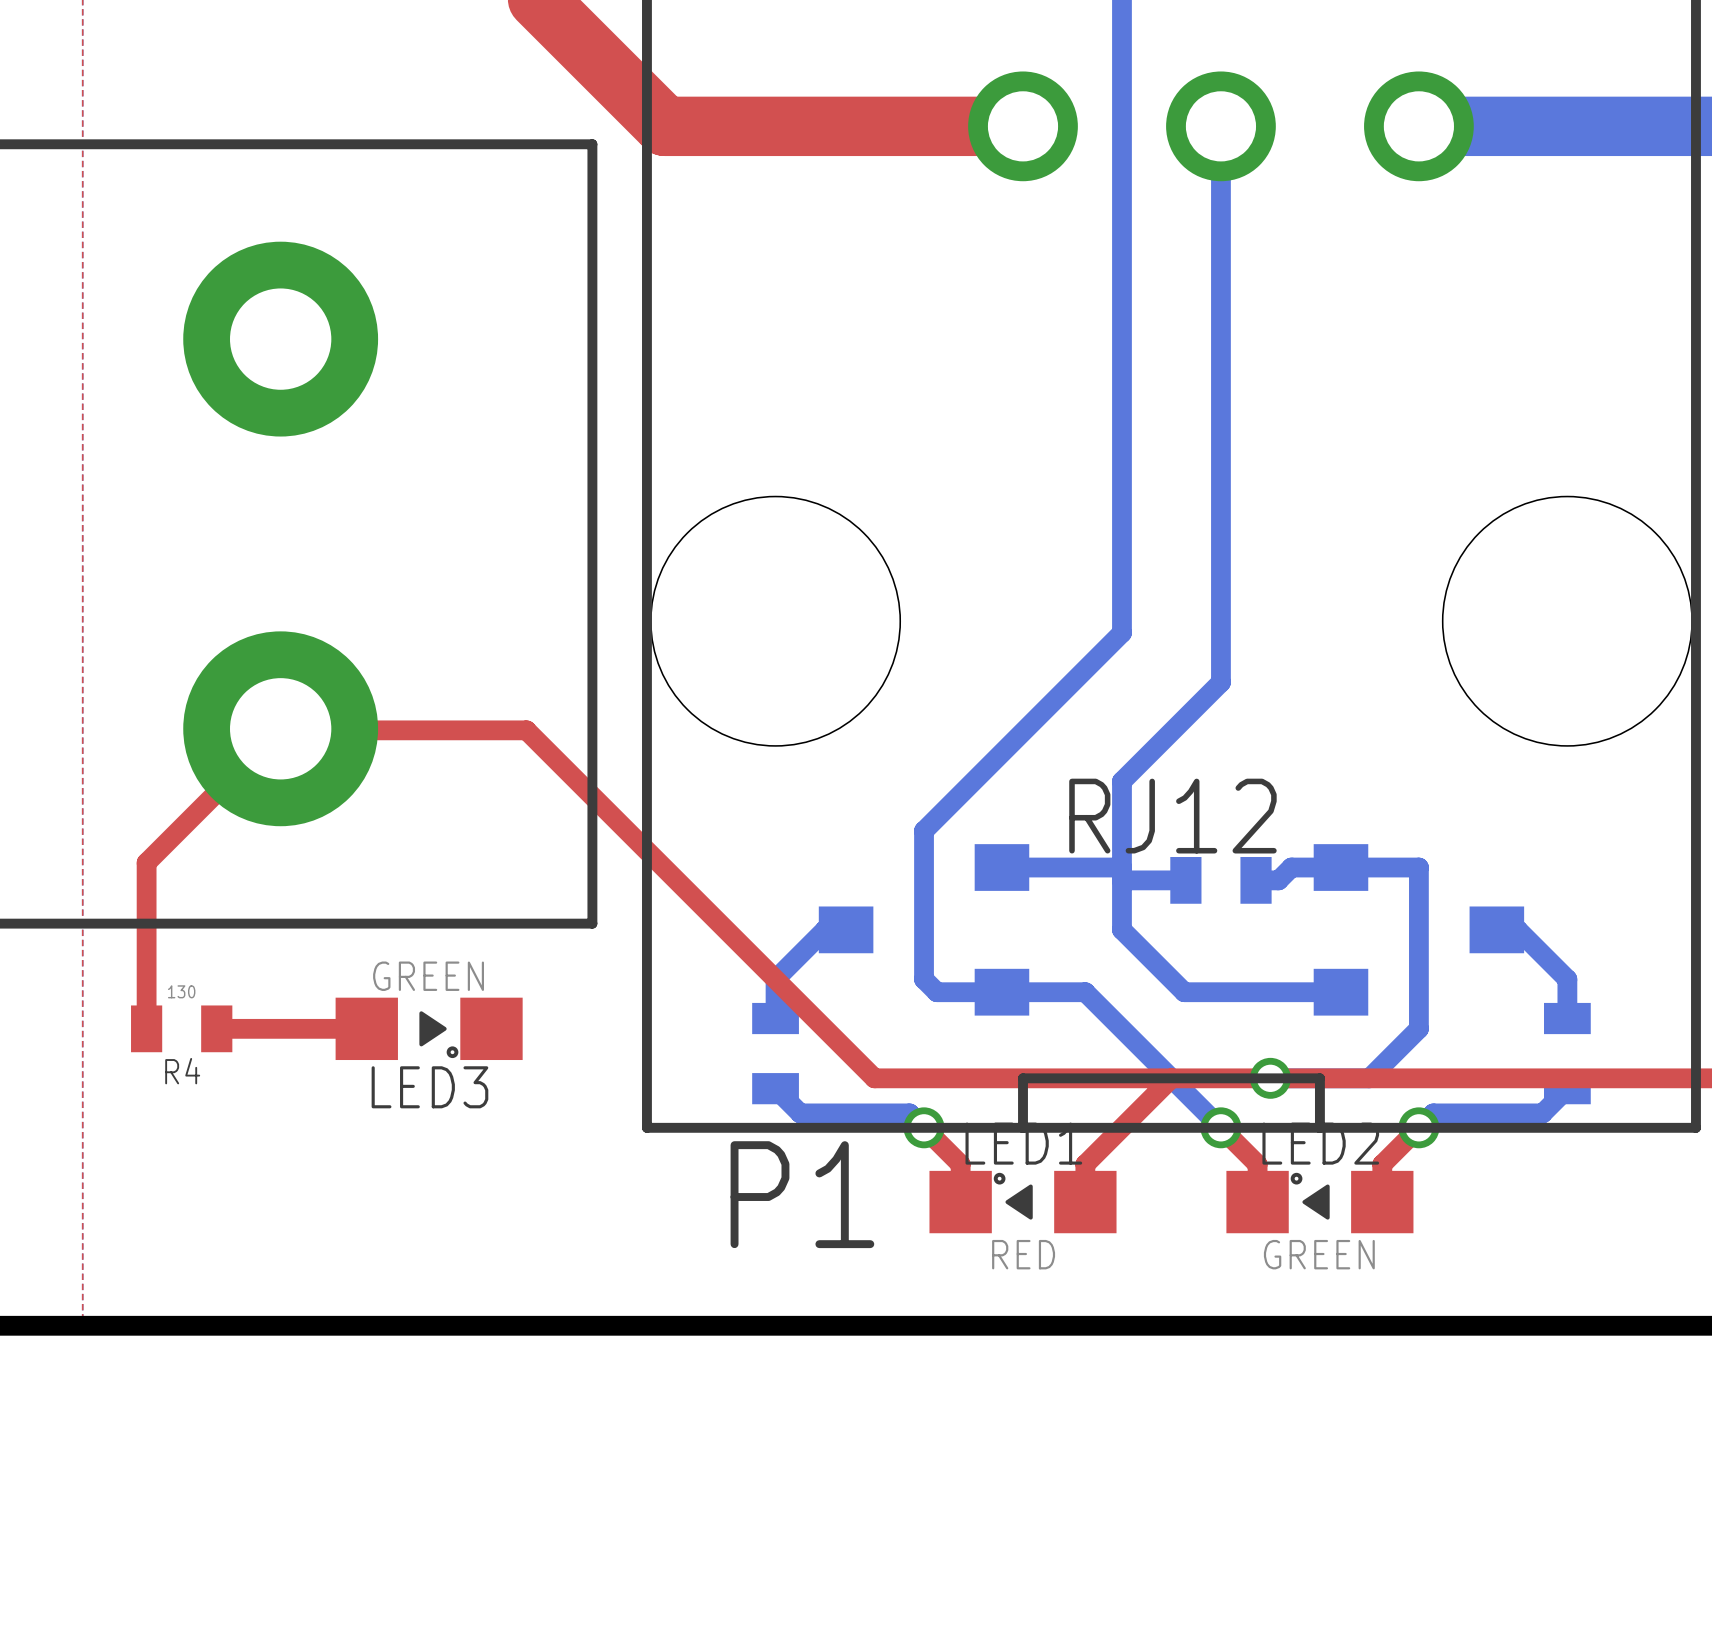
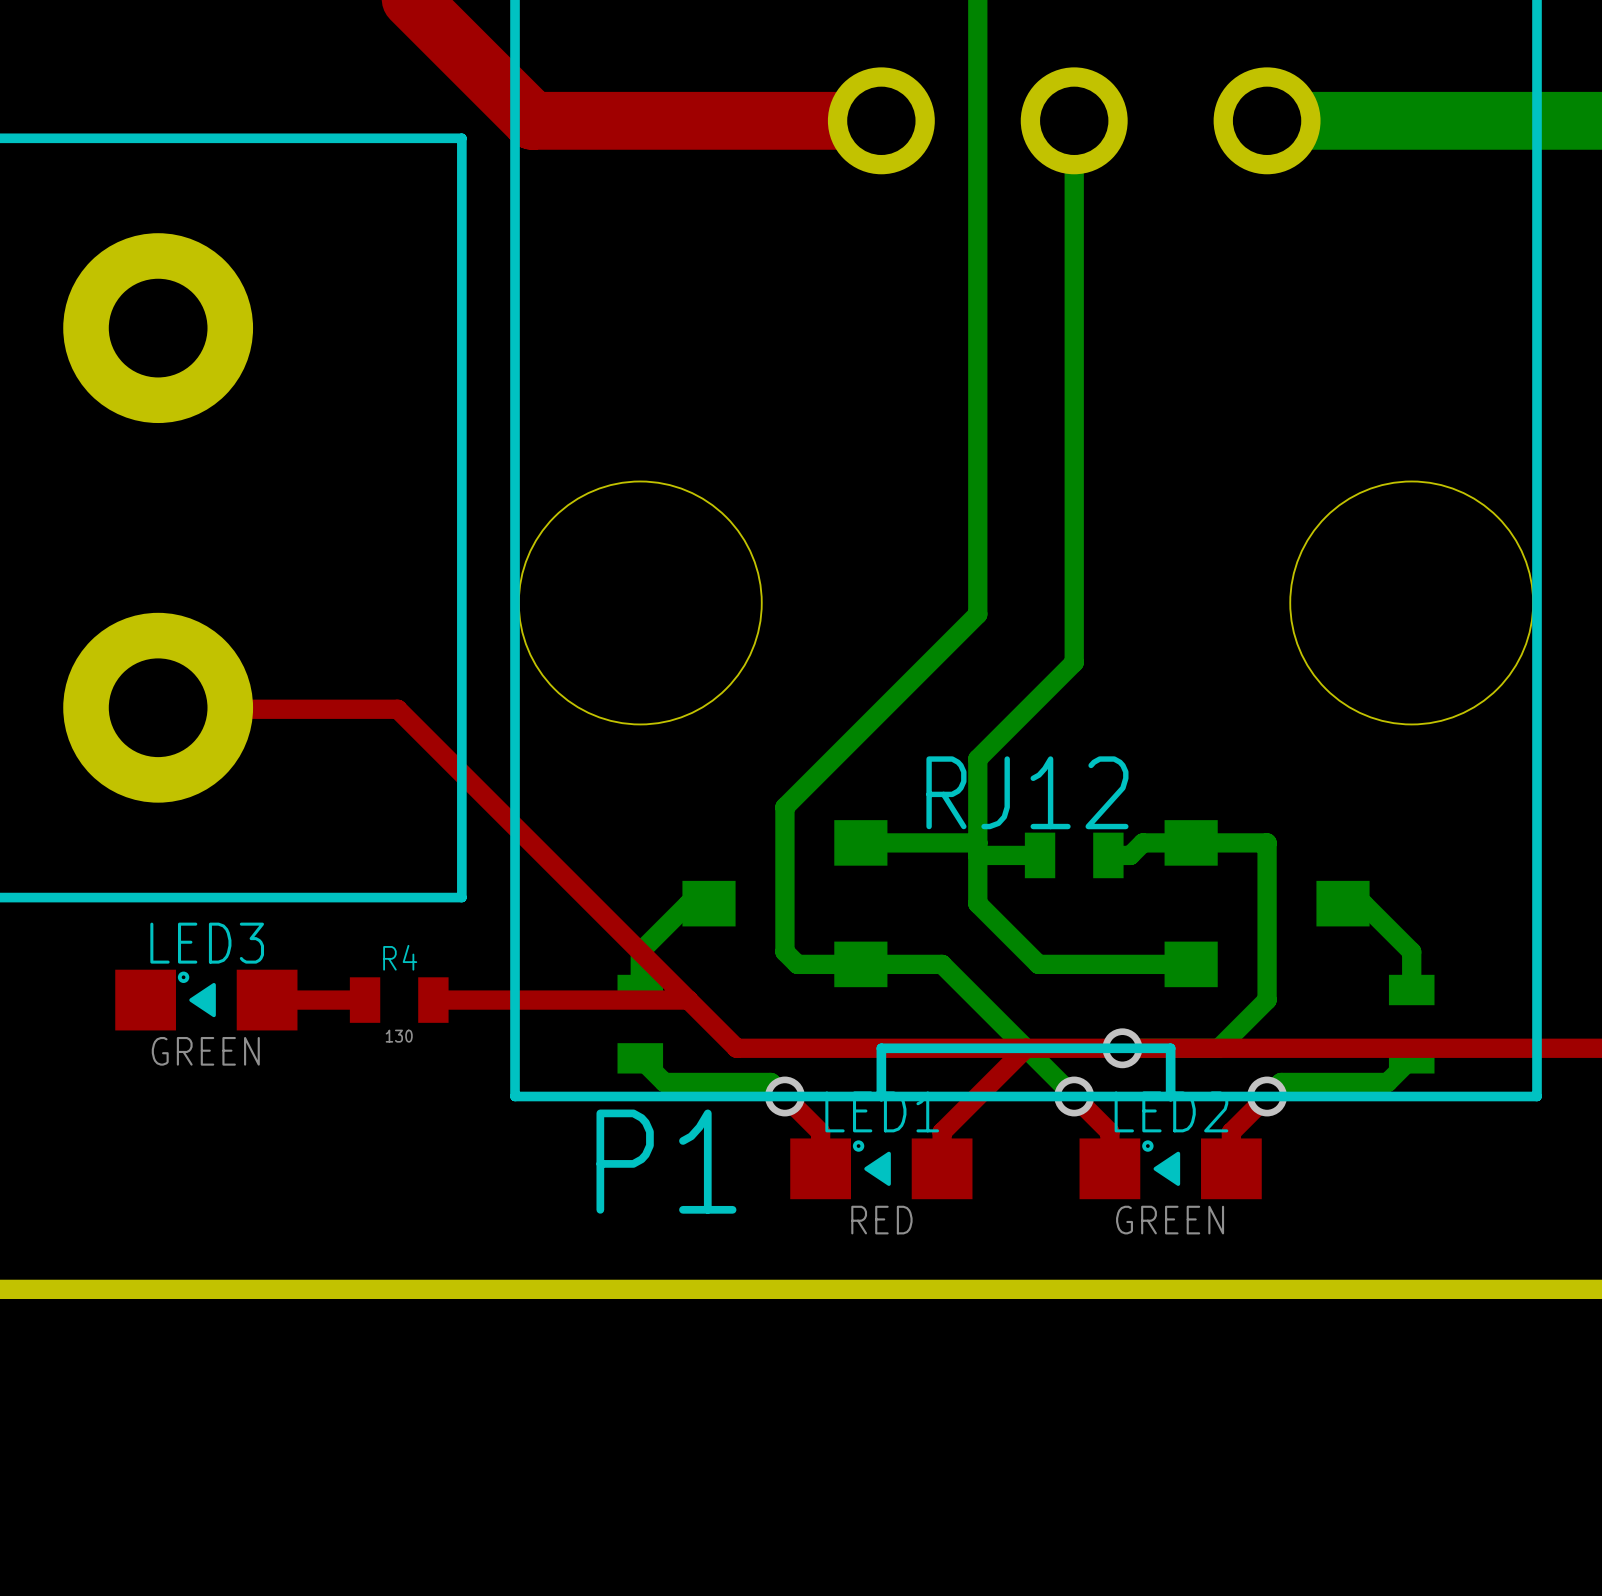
top track: (279, 730) (146, 862) (146, 1028) -> none
R4 value position: 130 (181, 991) -> 130 (399, 1036)
R4 position: (181, 1028) -> (399, 1000)
top track: (216, 1028) (366, 1028) -> none
top track: none -> (267, 1000) (365, 1000)
LED3 rotation: 0° (429, 1028) -> 180° (206, 1000)
top track: none -> (433, 1000) (688, 1000)
R4 name position: R4 (182, 1071) -> R4 (400, 957)

